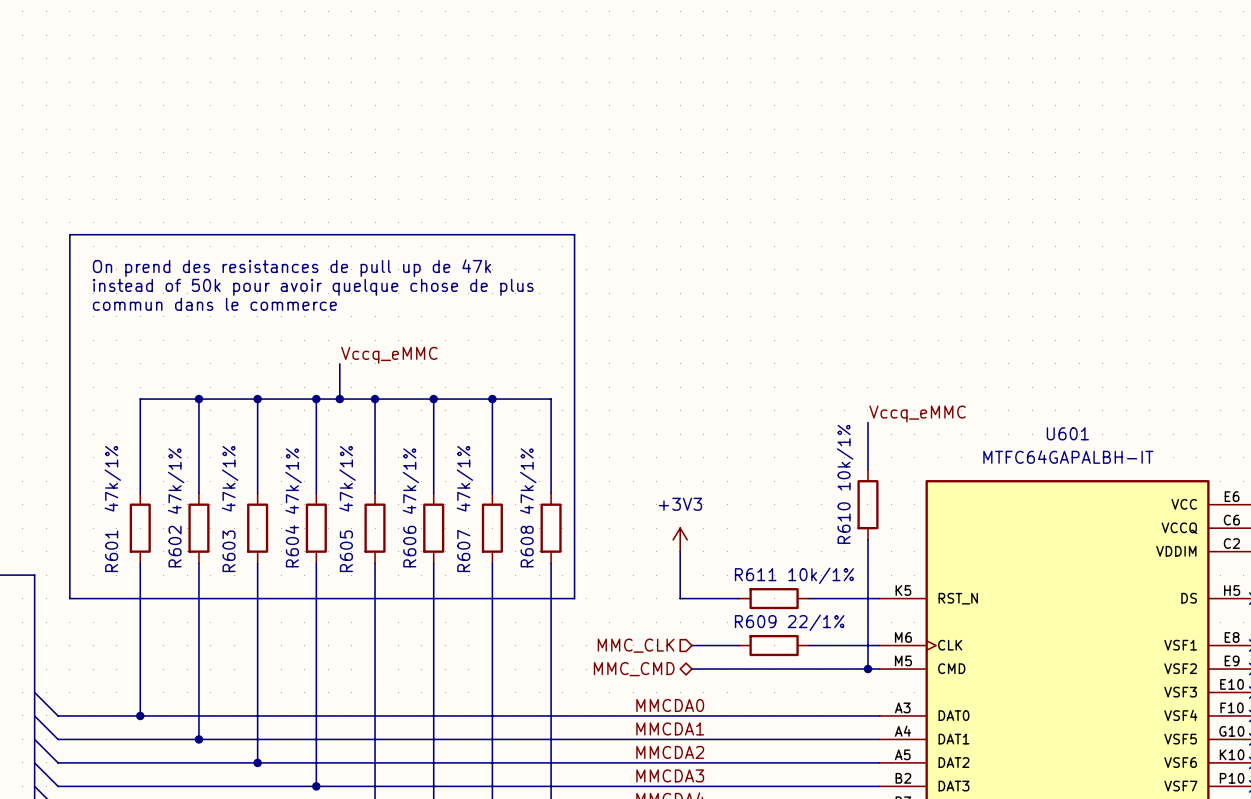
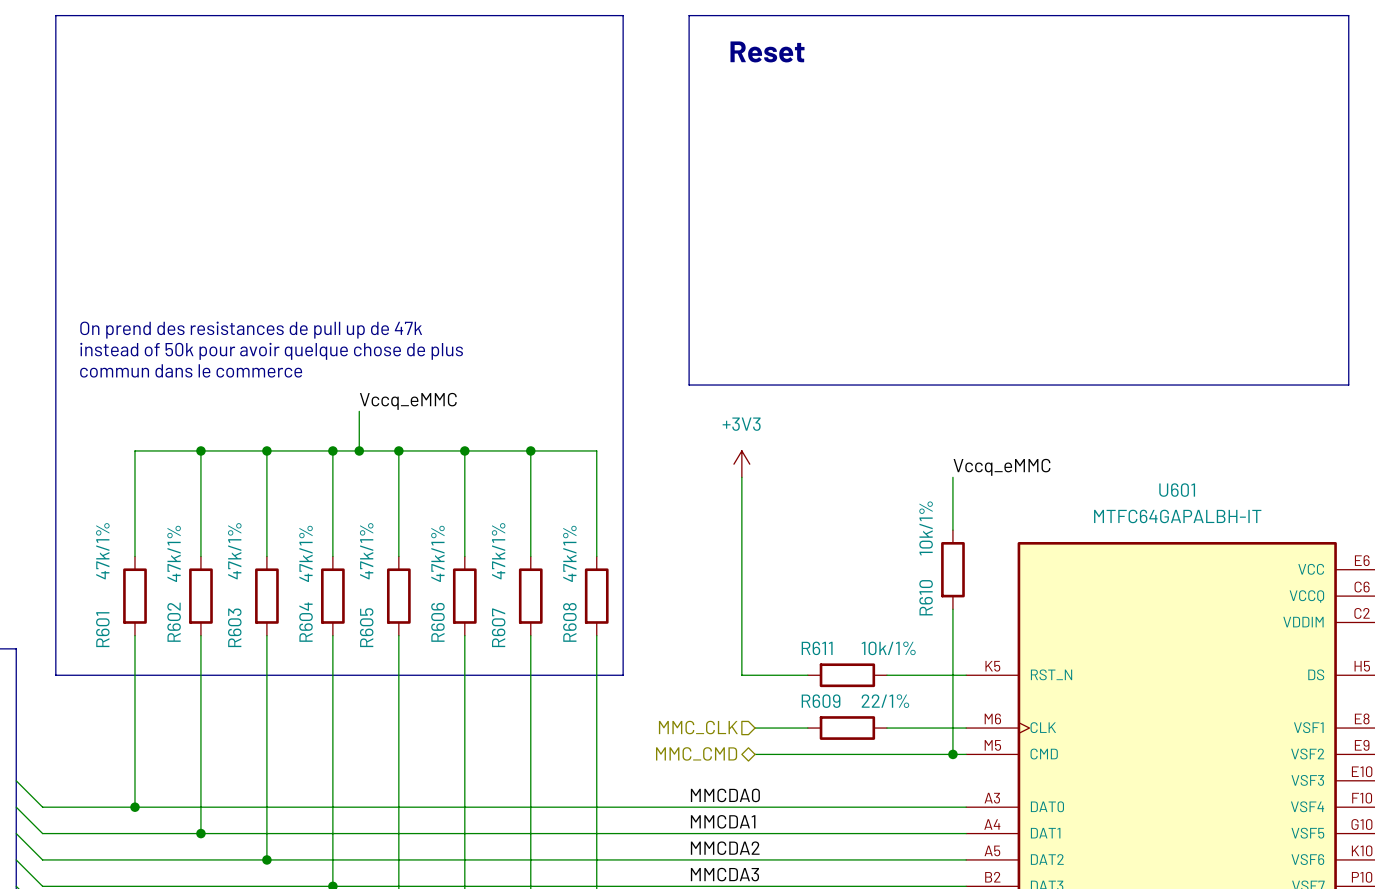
line: none -> (689, 15) (1348, 15) (1348, 385) (689, 385) (689, 15)
text: none -> Reset (767, 51)
line: (69, 234) (574, 234) -> (55, 266) (55, 15) (623, 15) (623, 266)
text: On prend des resistances de pull up de 47k (292, 268) -> none
text: instead of 50k pour avoir quelque chose de plus (313, 287) -> On prend des resistances de pull up de 47k (251, 330)
text: commun dans le commerce (214, 304) -> instead of 50k pour avoir quelque chose de plus (271, 351)
text: none -> commun dans le commerce (191, 370)
wire: none -> (741, 477) (741, 622)
power symbol position: +3V3 (680, 539) -> +3V3 (741, 464)

